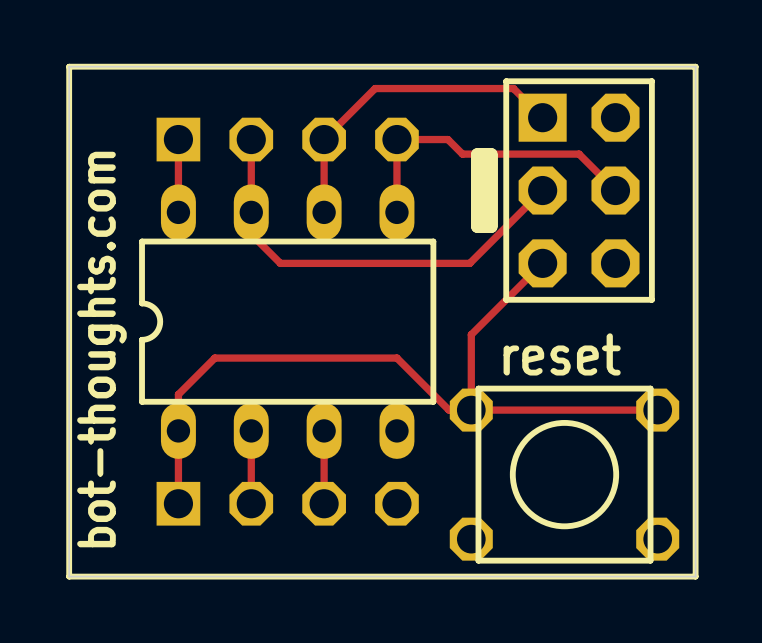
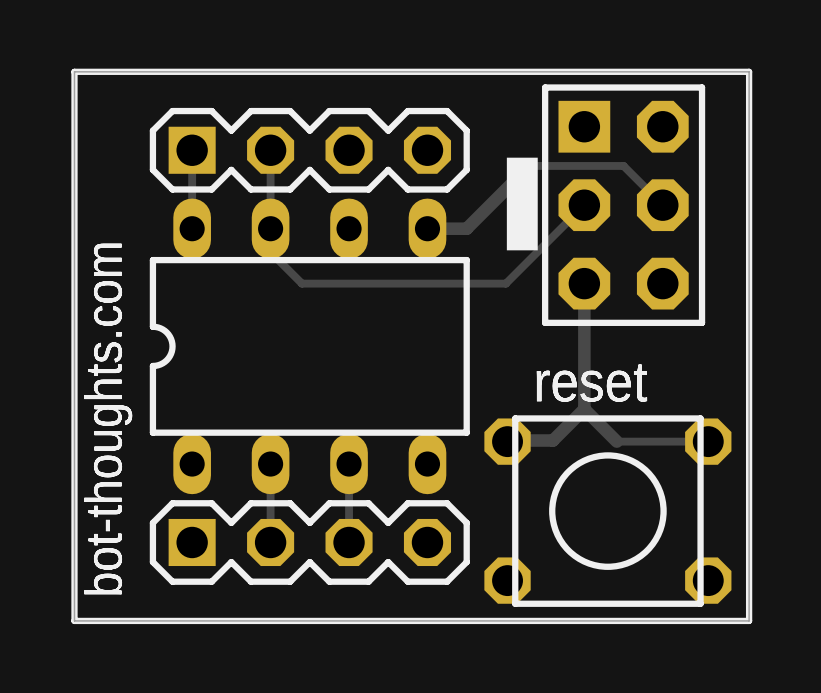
line: none -> (172, 111) (211, 111) (231, 130) (250, 111) (290, 111) (309, 130) (329, 111) (368, 111) (388, 130) (407, 111) (447, 111) (466, 130) (466, 169) (447, 189) (407, 189) (388, 169) (368, 189) (329, 189) (309, 169) (290, 189) (250, 189) (231, 169) (211, 189) (172, 189) (152, 169) (152, 130) (172, 111)
track: (542, 117) (513, 88) (375, 88) (324, 139) (324, 212) -> none
drawing shape: [471, 148, 498, 233] -> [506, 157, 538, 251]
track: (491, 154) (462, 154) (447, 139) (396, 139) (396, 212) -> (529, 165) (466, 228) (427, 228)
track: (542, 263) (471, 334) (471, 410) -> (584, 283) (584, 409)
track: none -> (584, 409) (552, 440) (507, 441)
track: (572, 410) (448, 410) (396, 358) (214, 358) (178, 394) (178, 503) -> (616, 441) (584, 409)
line: none -> (172, 503) (211, 503) (231, 522) (250, 503) (290, 503) (309, 522) (329, 503) (368, 503) (388, 522) (407, 503) (447, 503) (466, 522) (466, 562) (447, 581) (407, 581) (388, 562) (368, 581) (329, 581) (309, 562) (290, 581) (250, 581) (231, 562) (211, 581) (172, 581) (152, 562) (152, 522) (172, 503)

